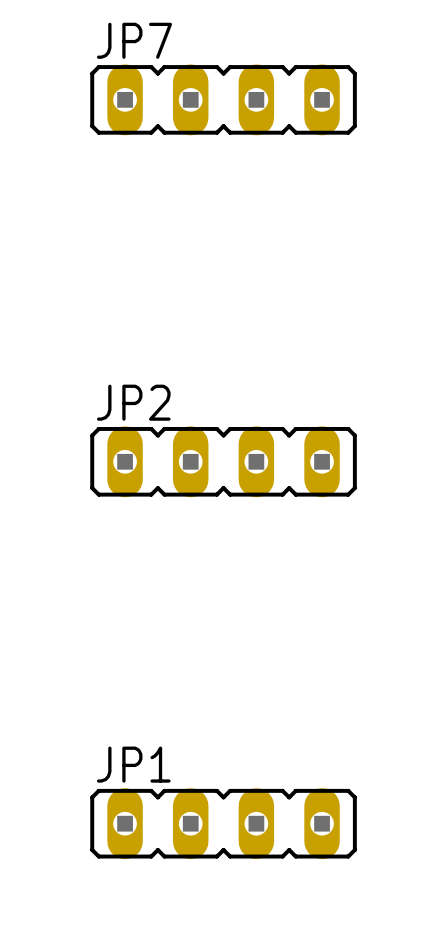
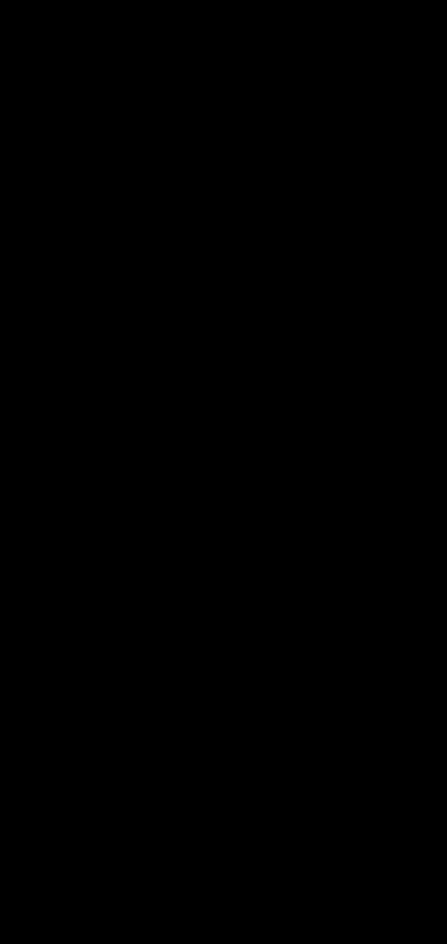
JP7: (223, 99) -> none
JP2: (223, 461) -> none
JP1: (223, 823) -> none

